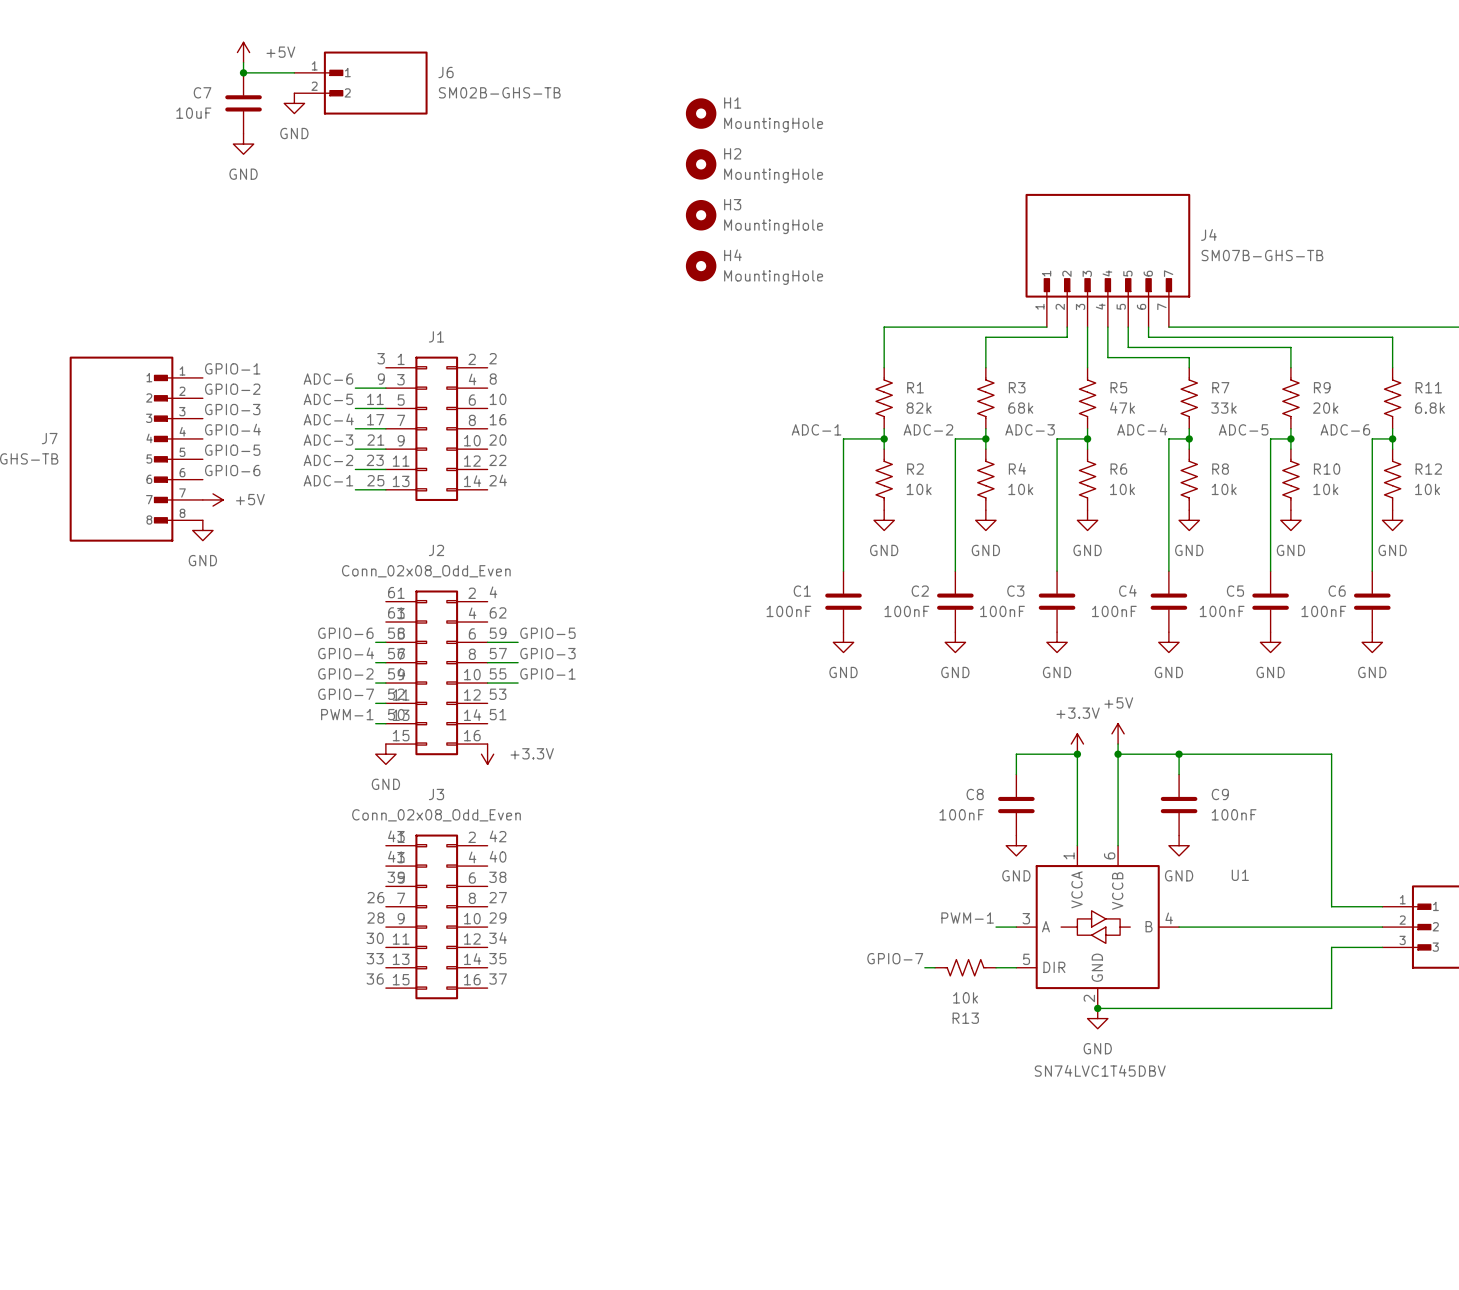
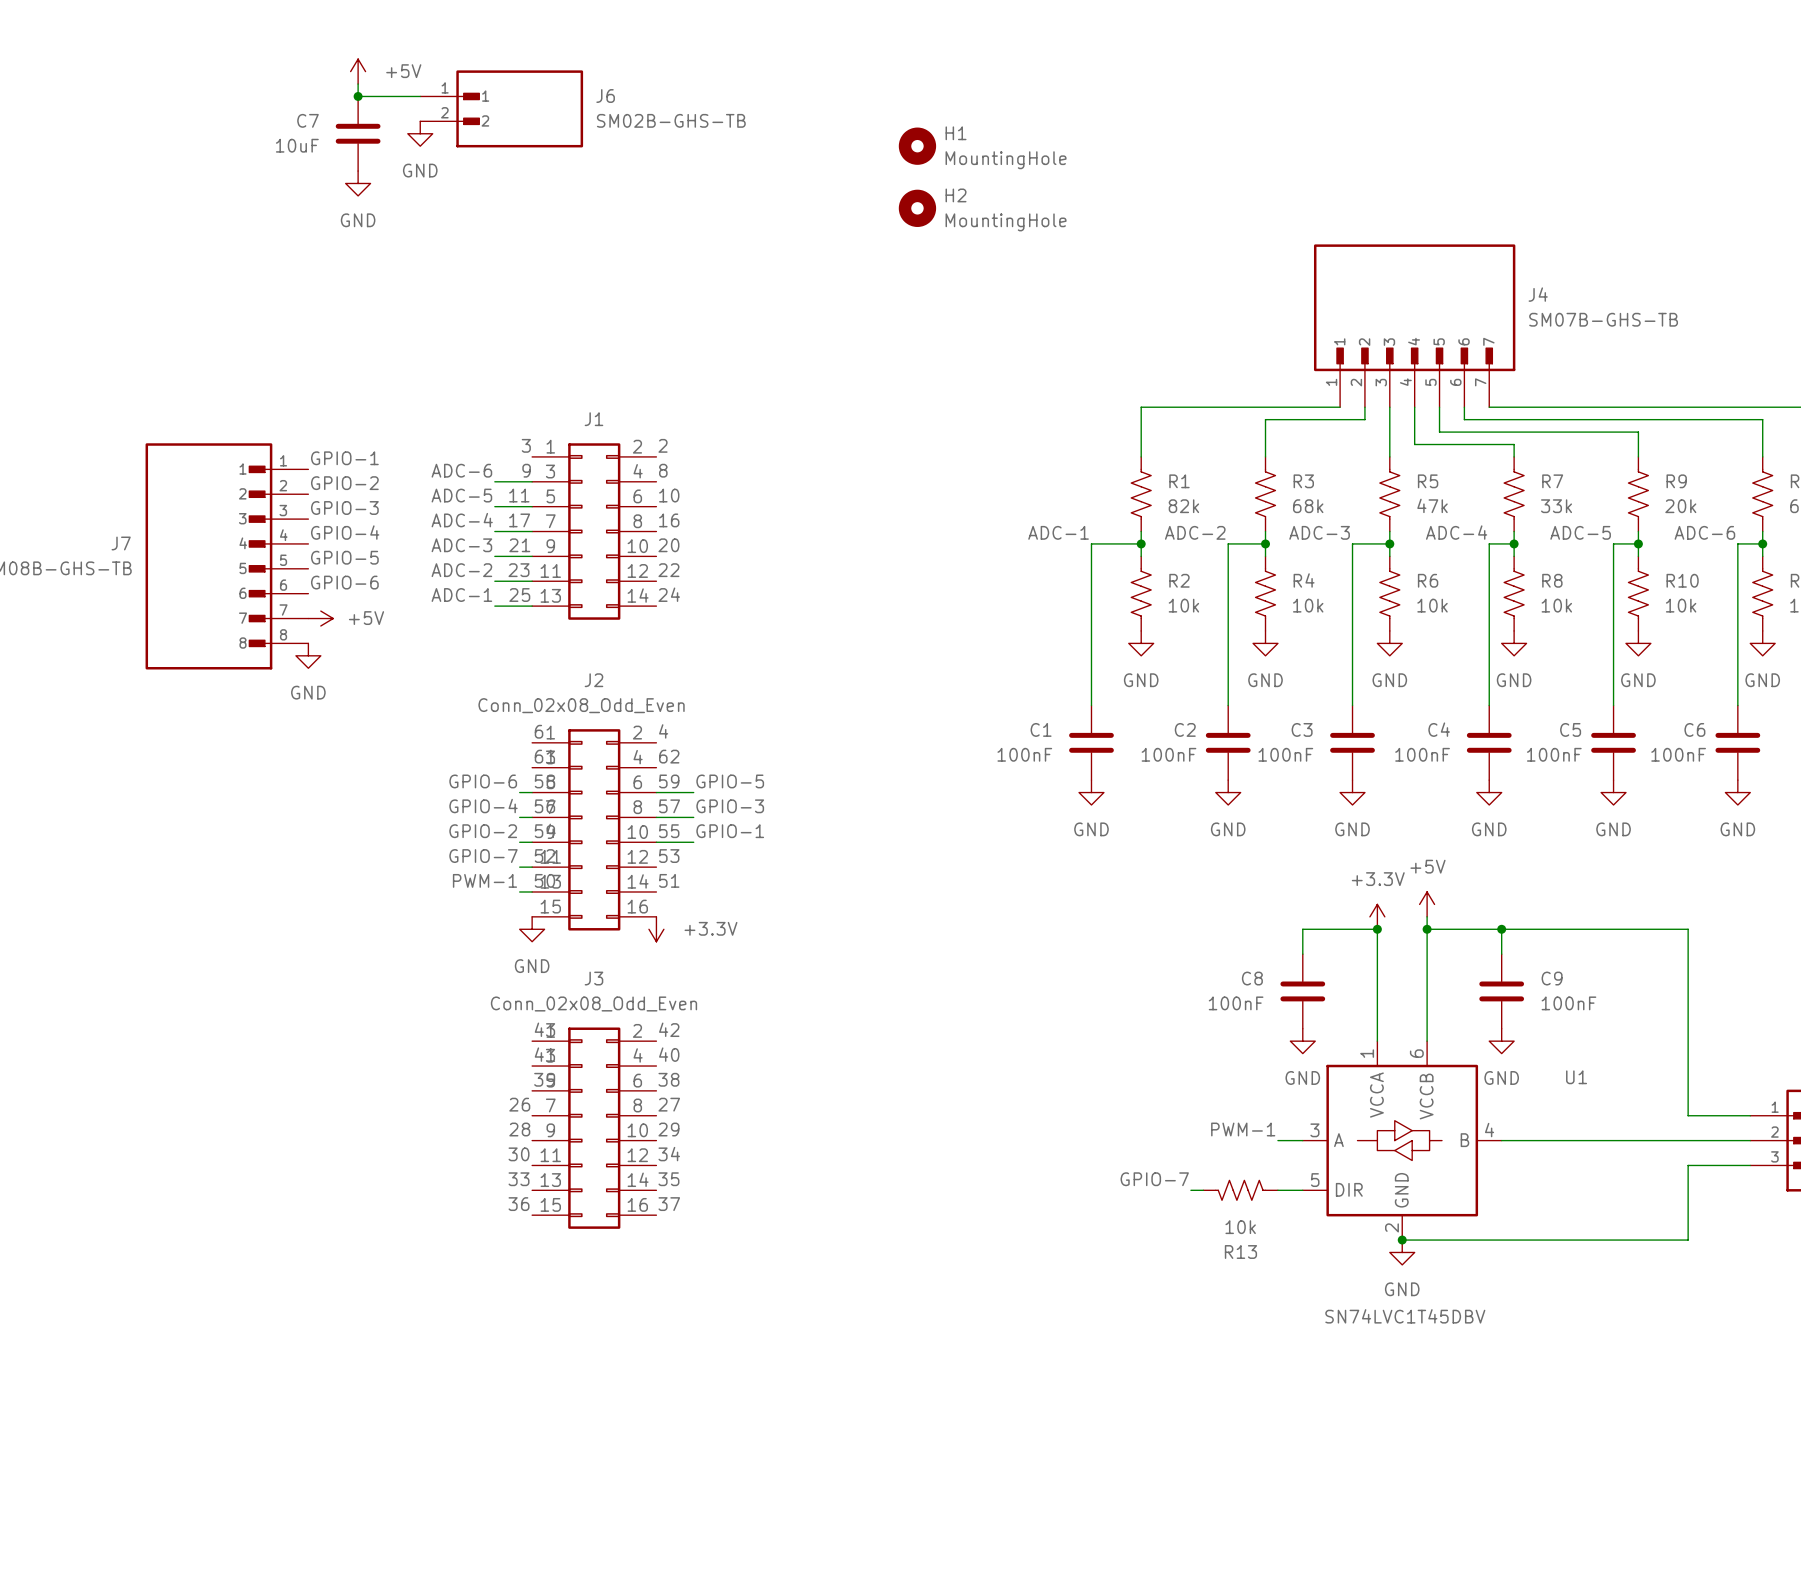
H3: MountingHole (701, 215) -> none
H4: MountingHole (701, 266) -> none

